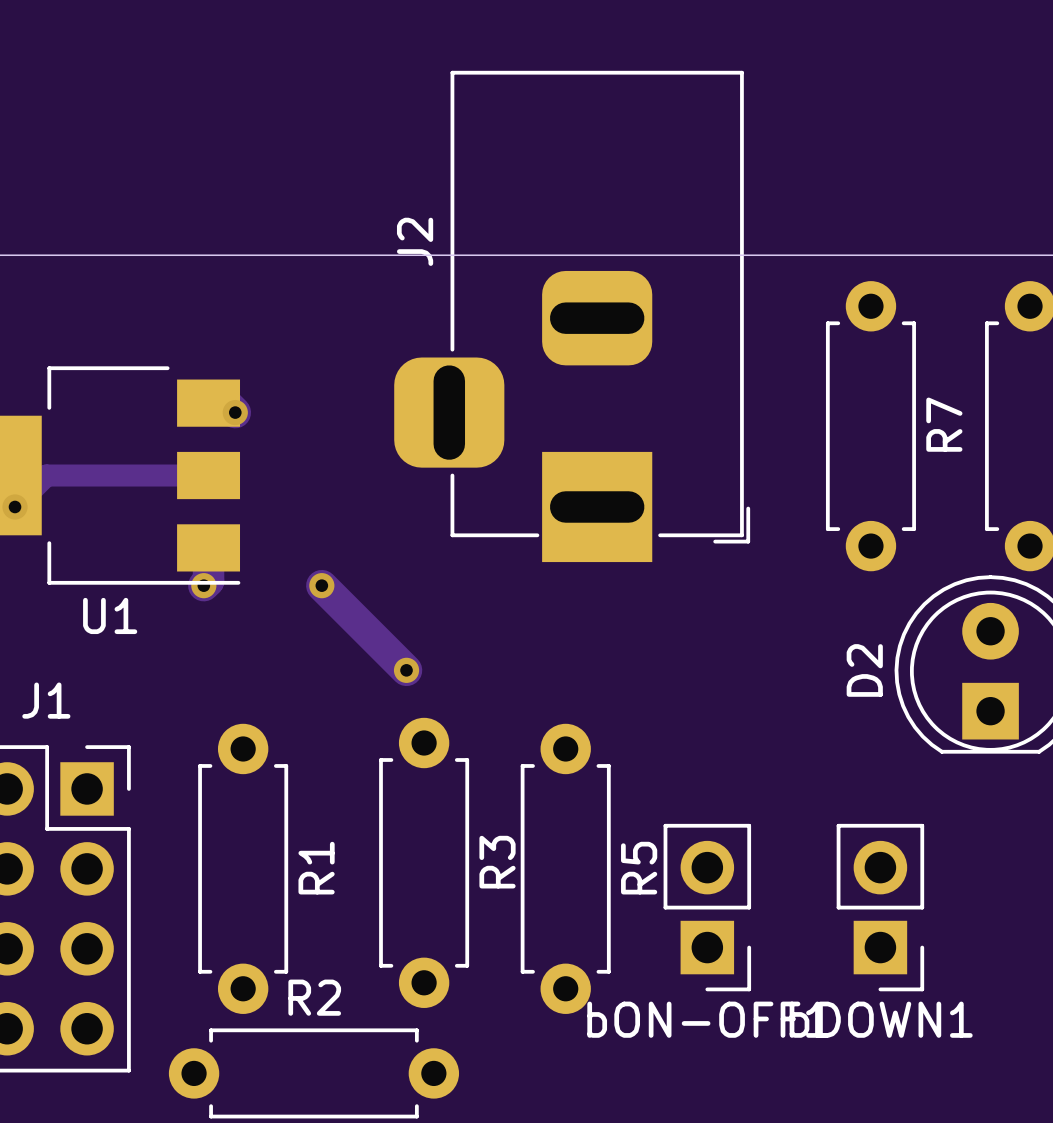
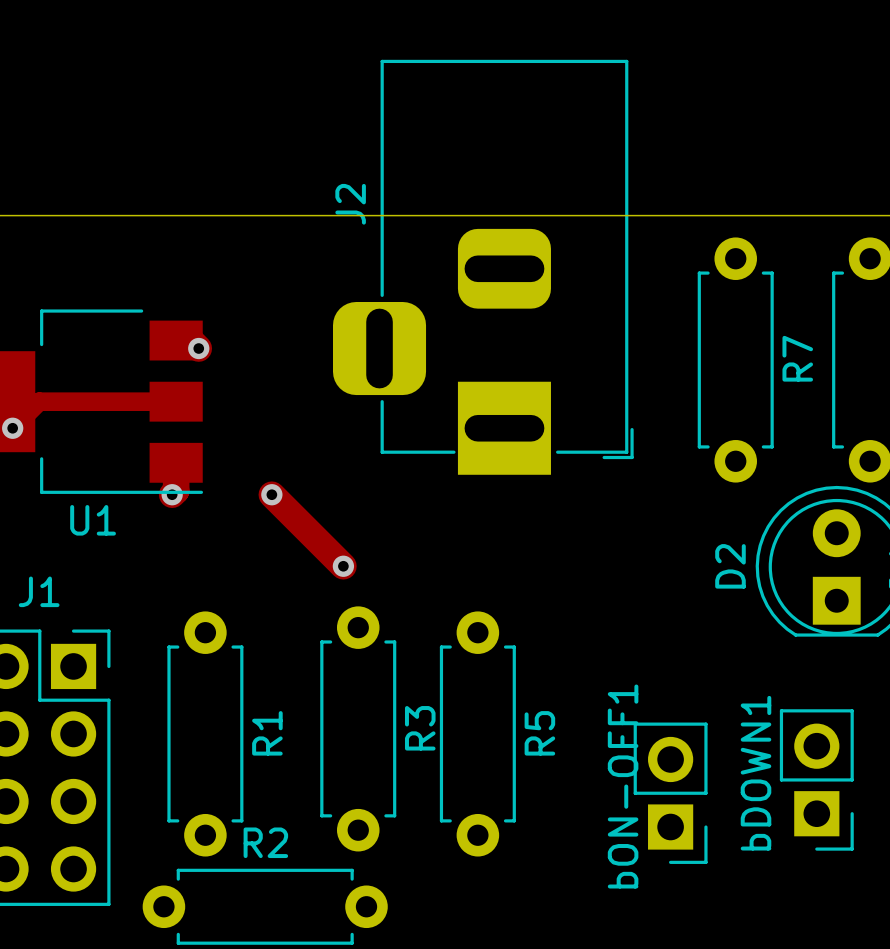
bON-OFF1 position: (707, 907) -> (670, 793)
bDOWN1 position: (880, 907) -> (816, 779)
bON-OFF1 name rotation: 0° (708, 1019) -> 90° counterclockwise (623, 786)
bDOWN1 name rotation: 0° (881, 1019) -> 90° counterclockwise (756, 773)

